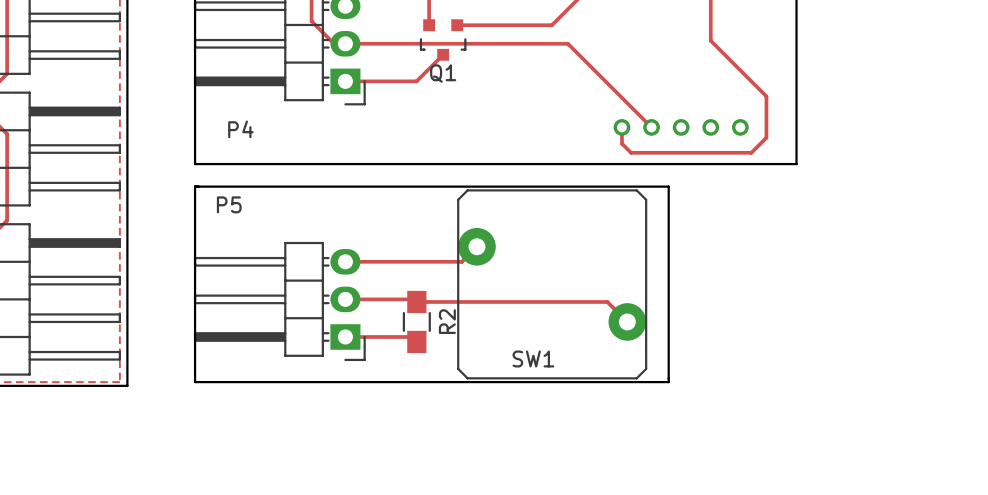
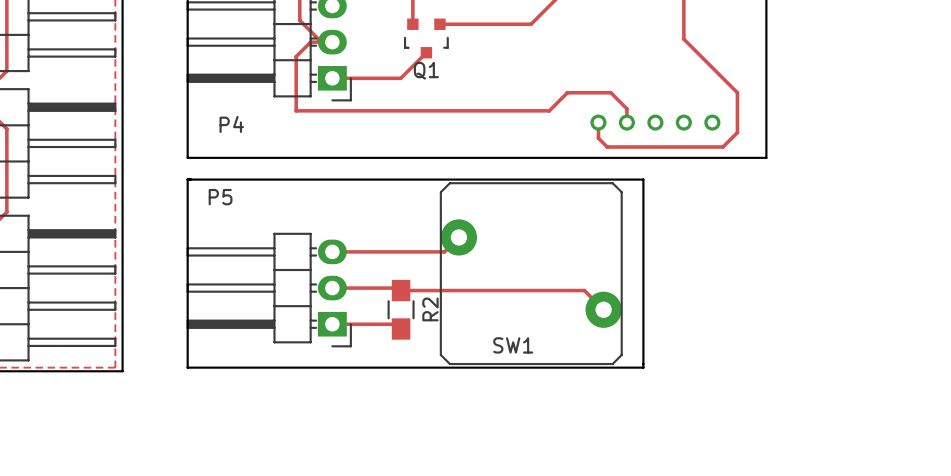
top track: (345, 43) (567, 43) (651, 127) -> (321, 42) (310, 42) (296, 56) (296, 110) (549, 110) (567, 92) (610, 92) (626, 108) (626, 122)

